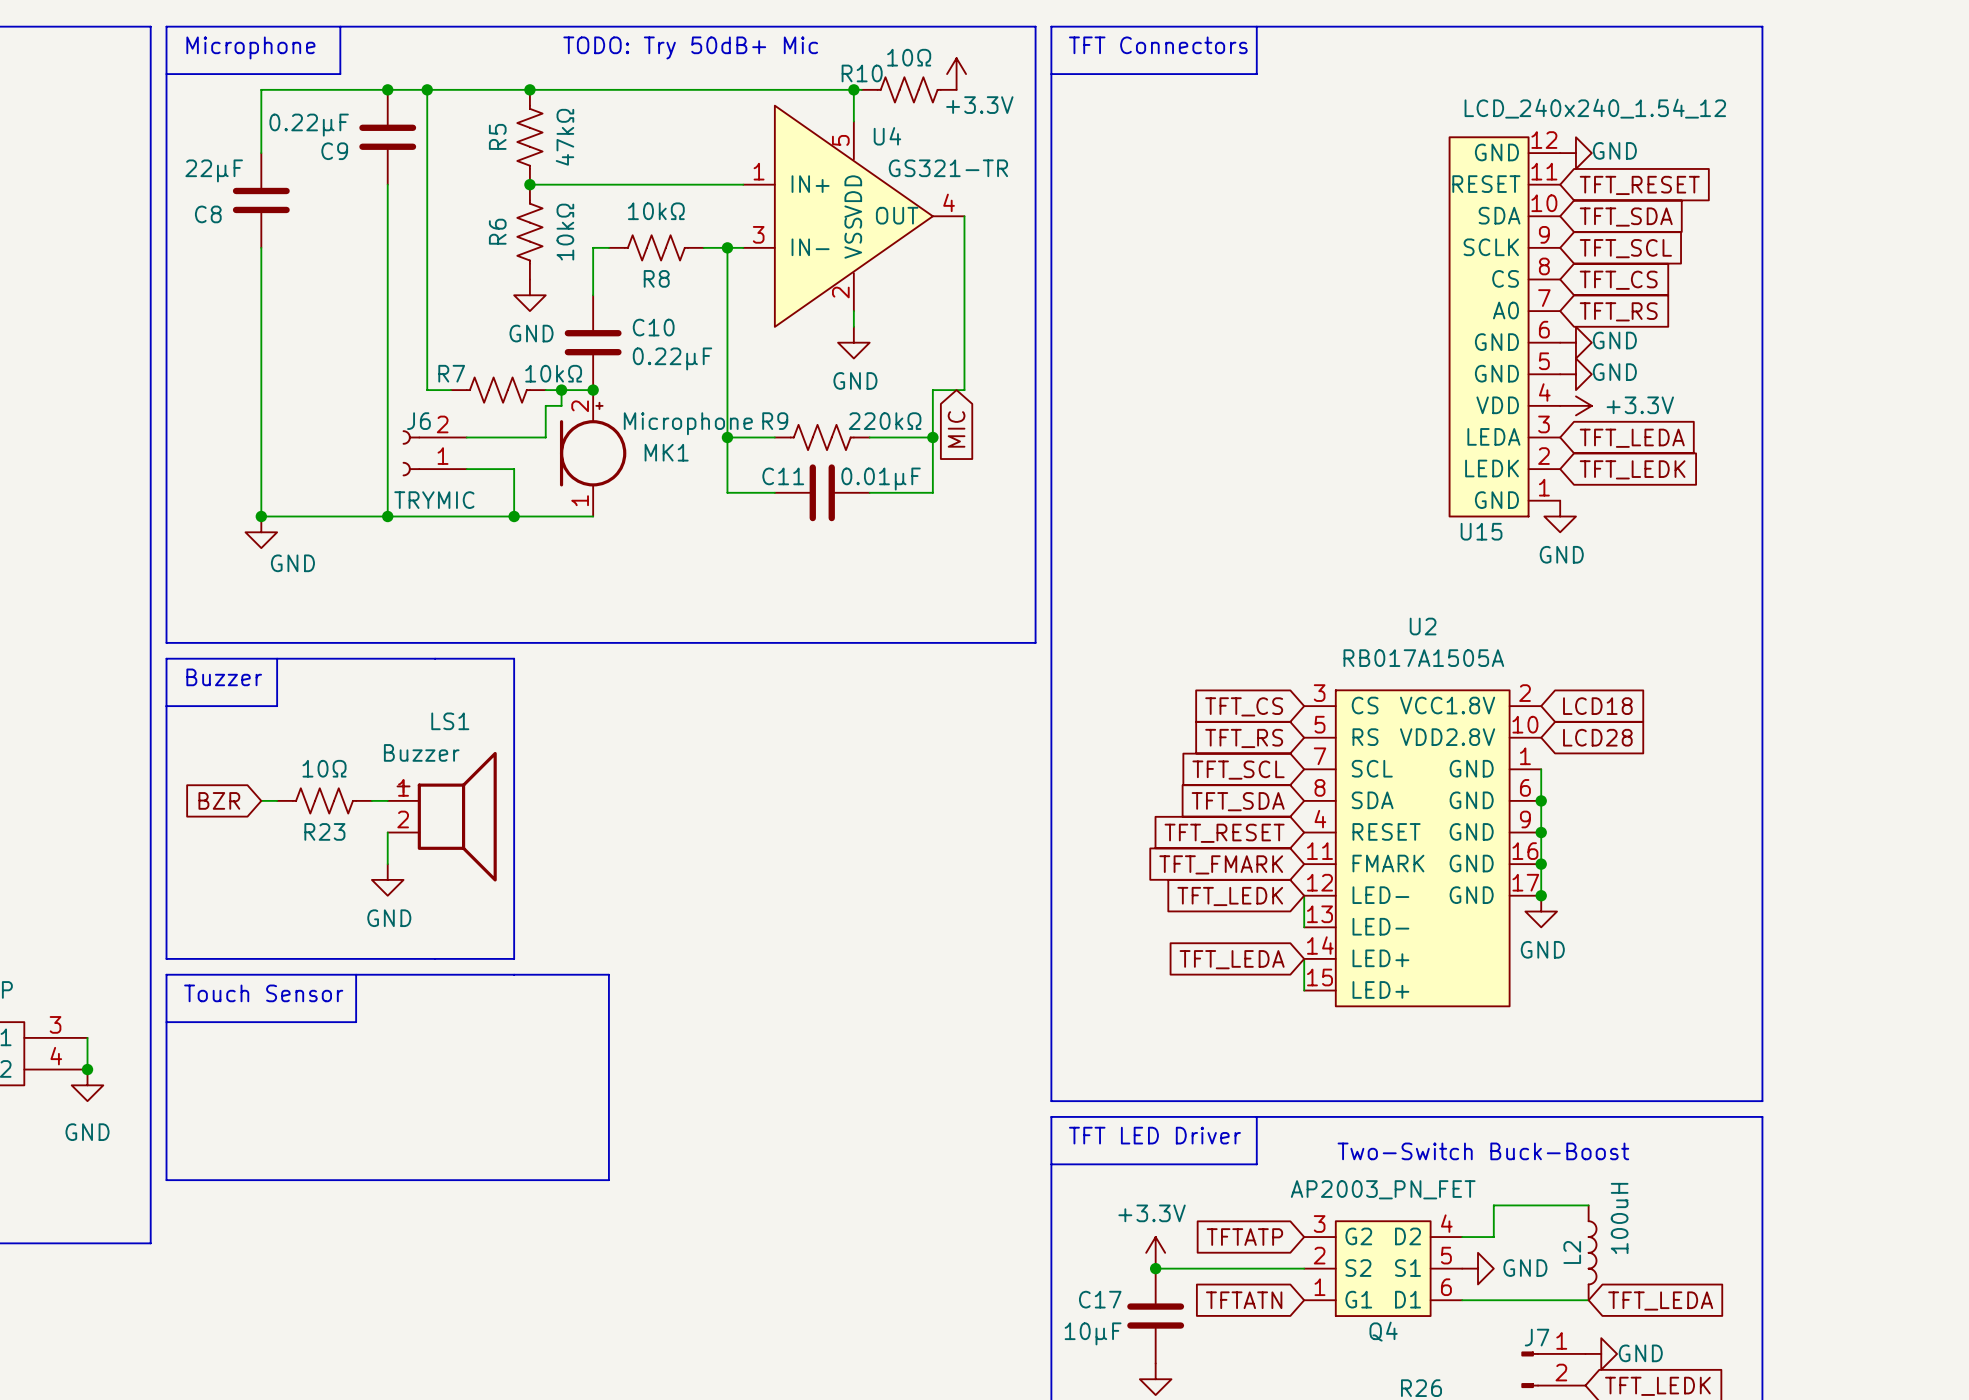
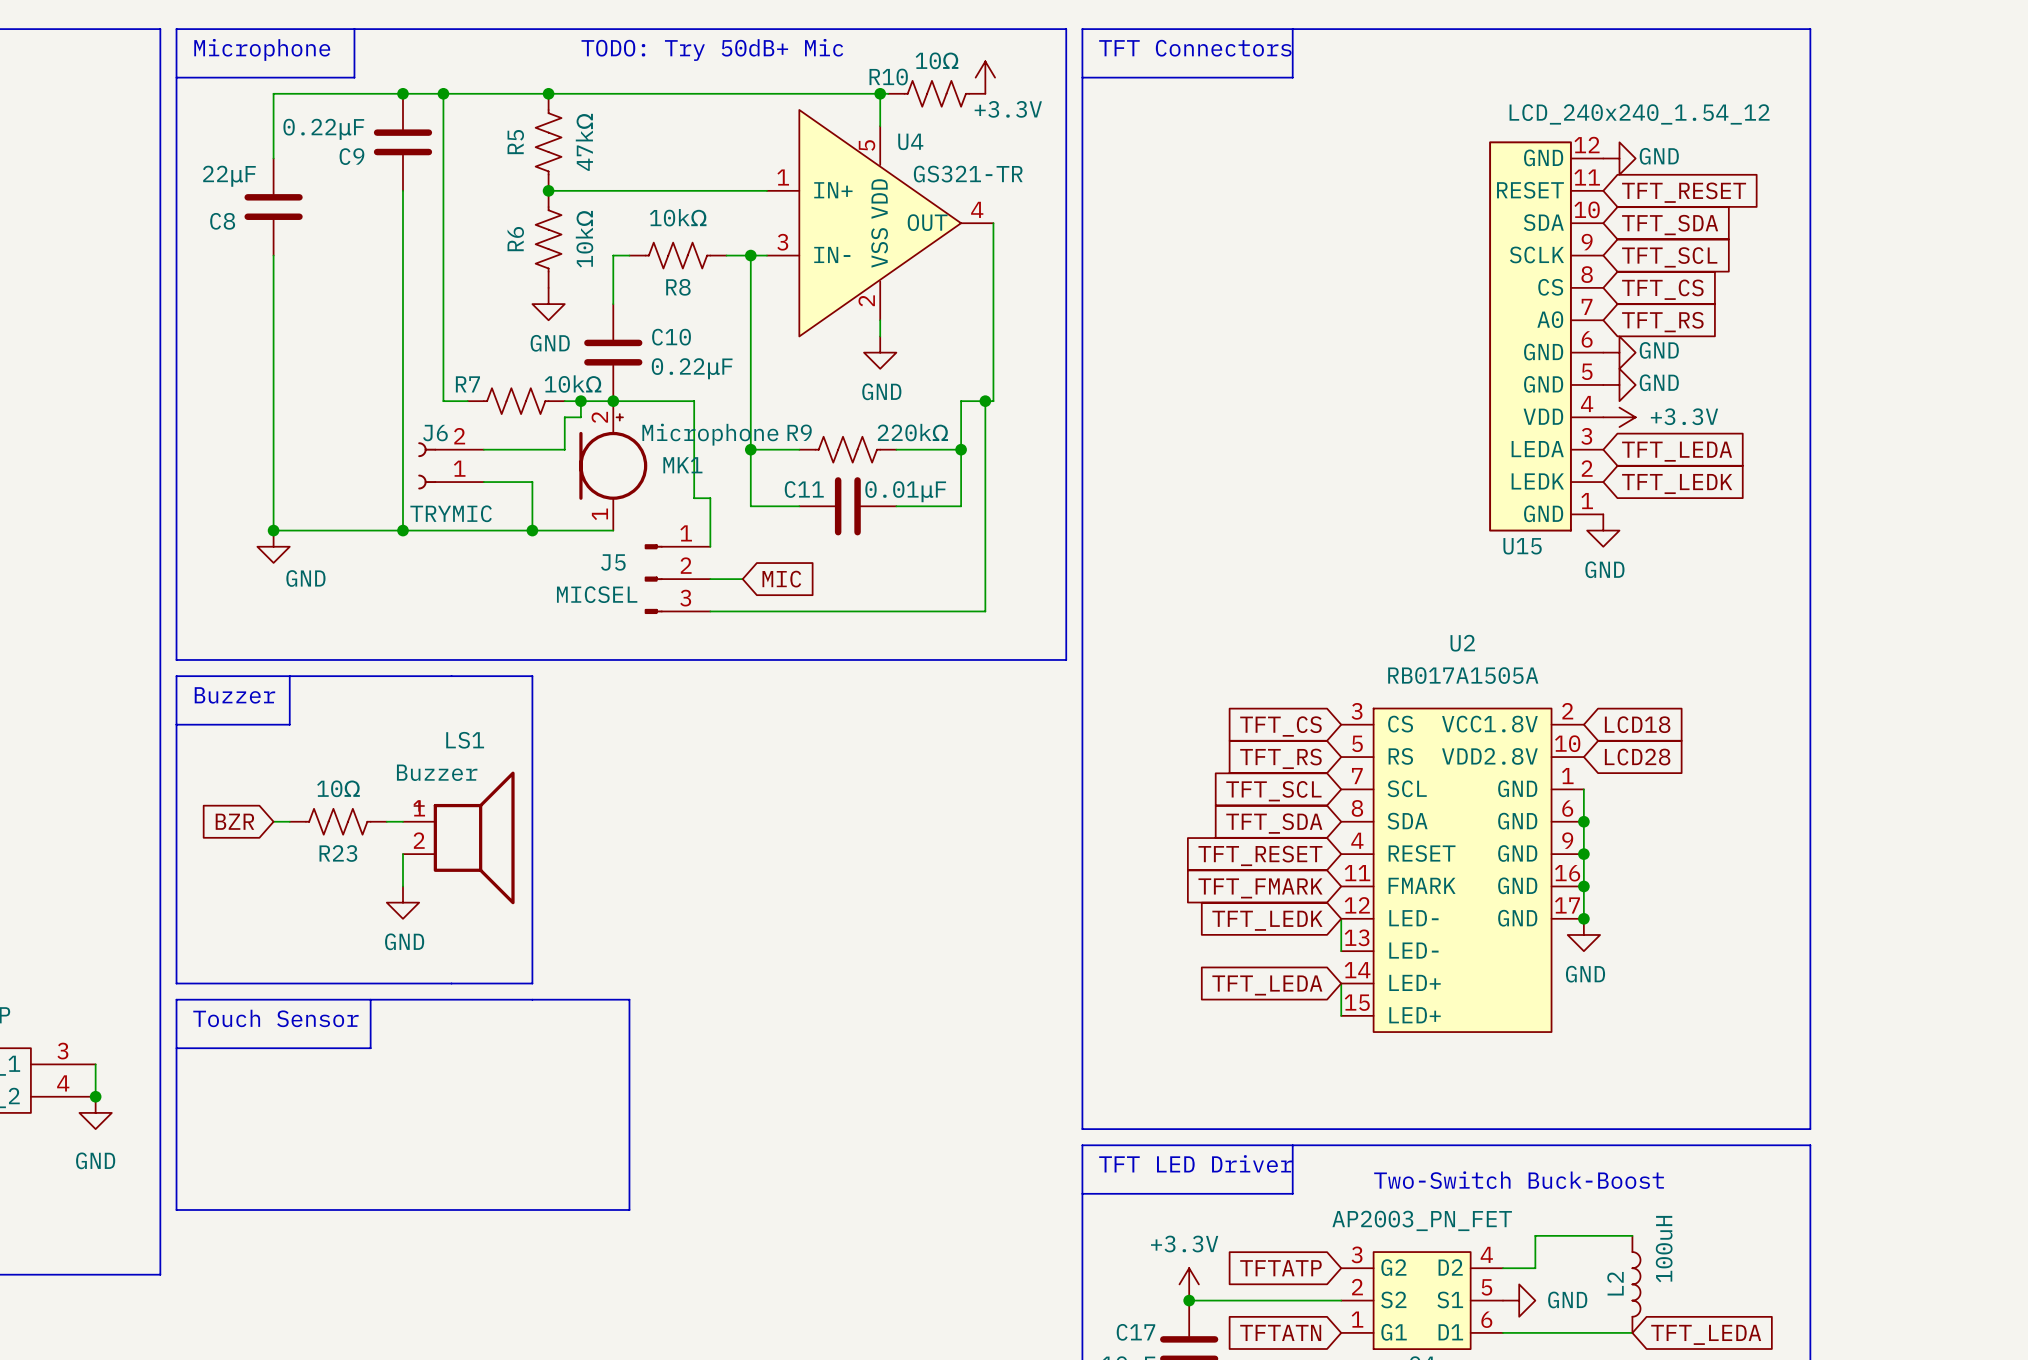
wire: none -> (613, 401) (694, 401) (694, 498) (710, 498) (710, 546)
wire: none -> (985, 401) (985, 611) (710, 611)
junction: none -> (985, 401)
global label rotation: 0° (956, 429) -> 90° counterclockwise (781, 579)
global label position: MIC (956, 429) -> MIC (781, 579)
J5: none -> MICSEL (677, 579)
wire: none -> (710, 579) (742, 579)

